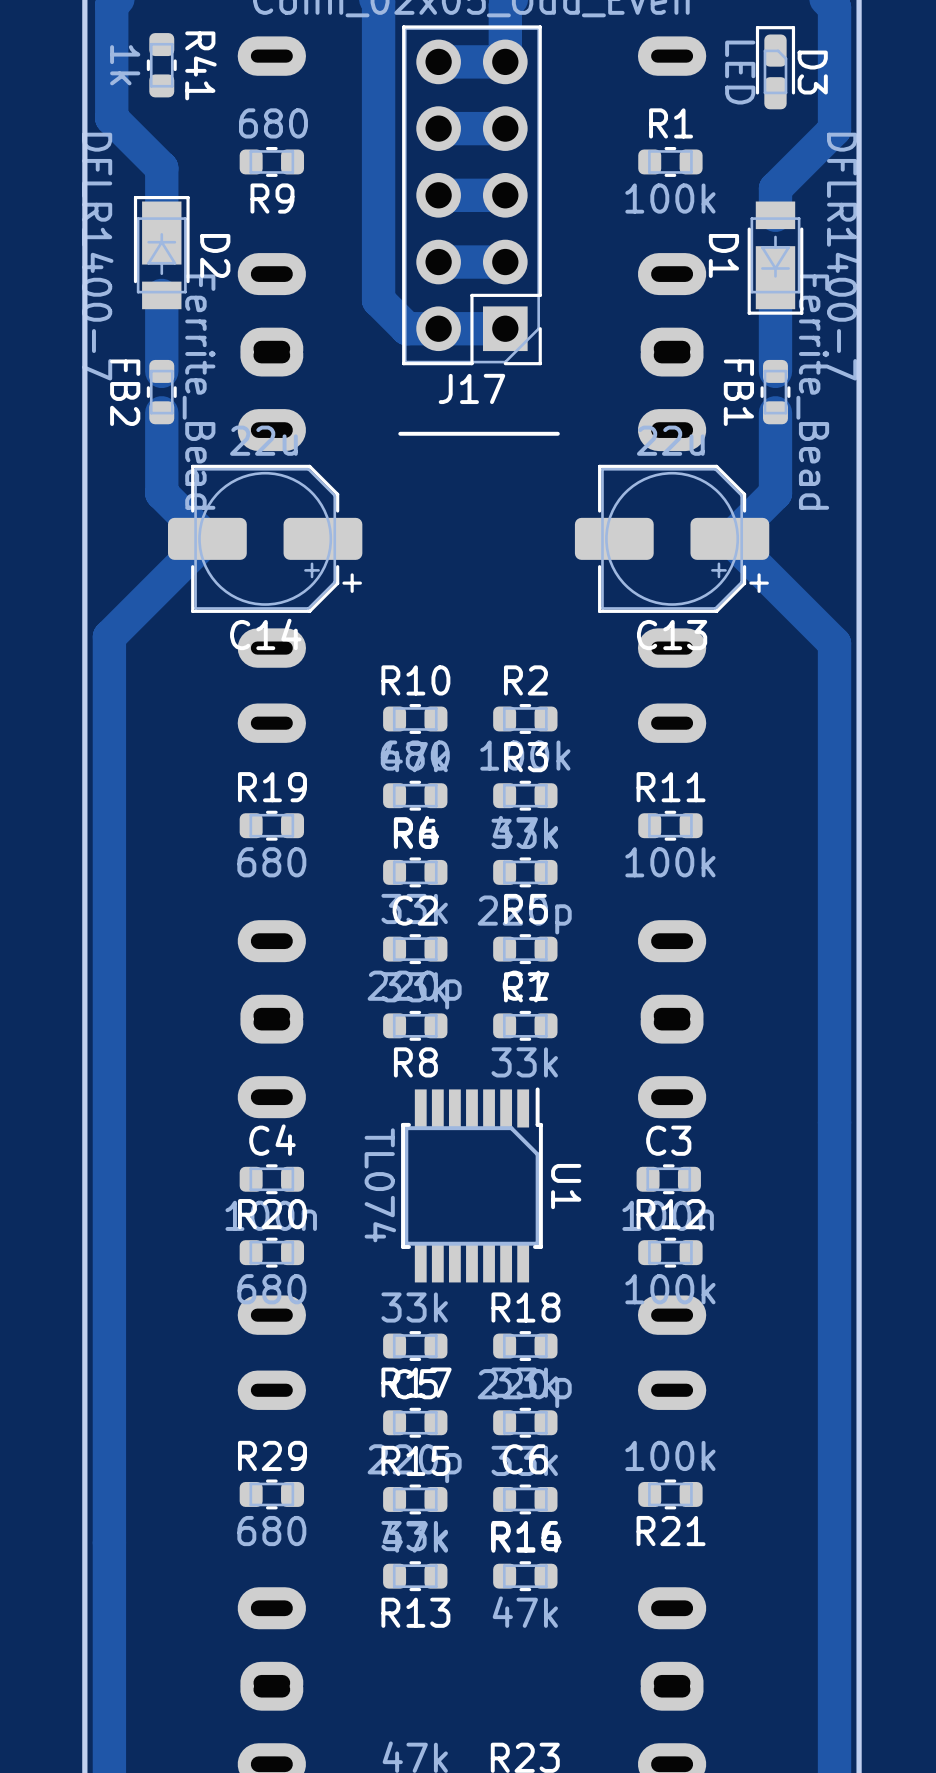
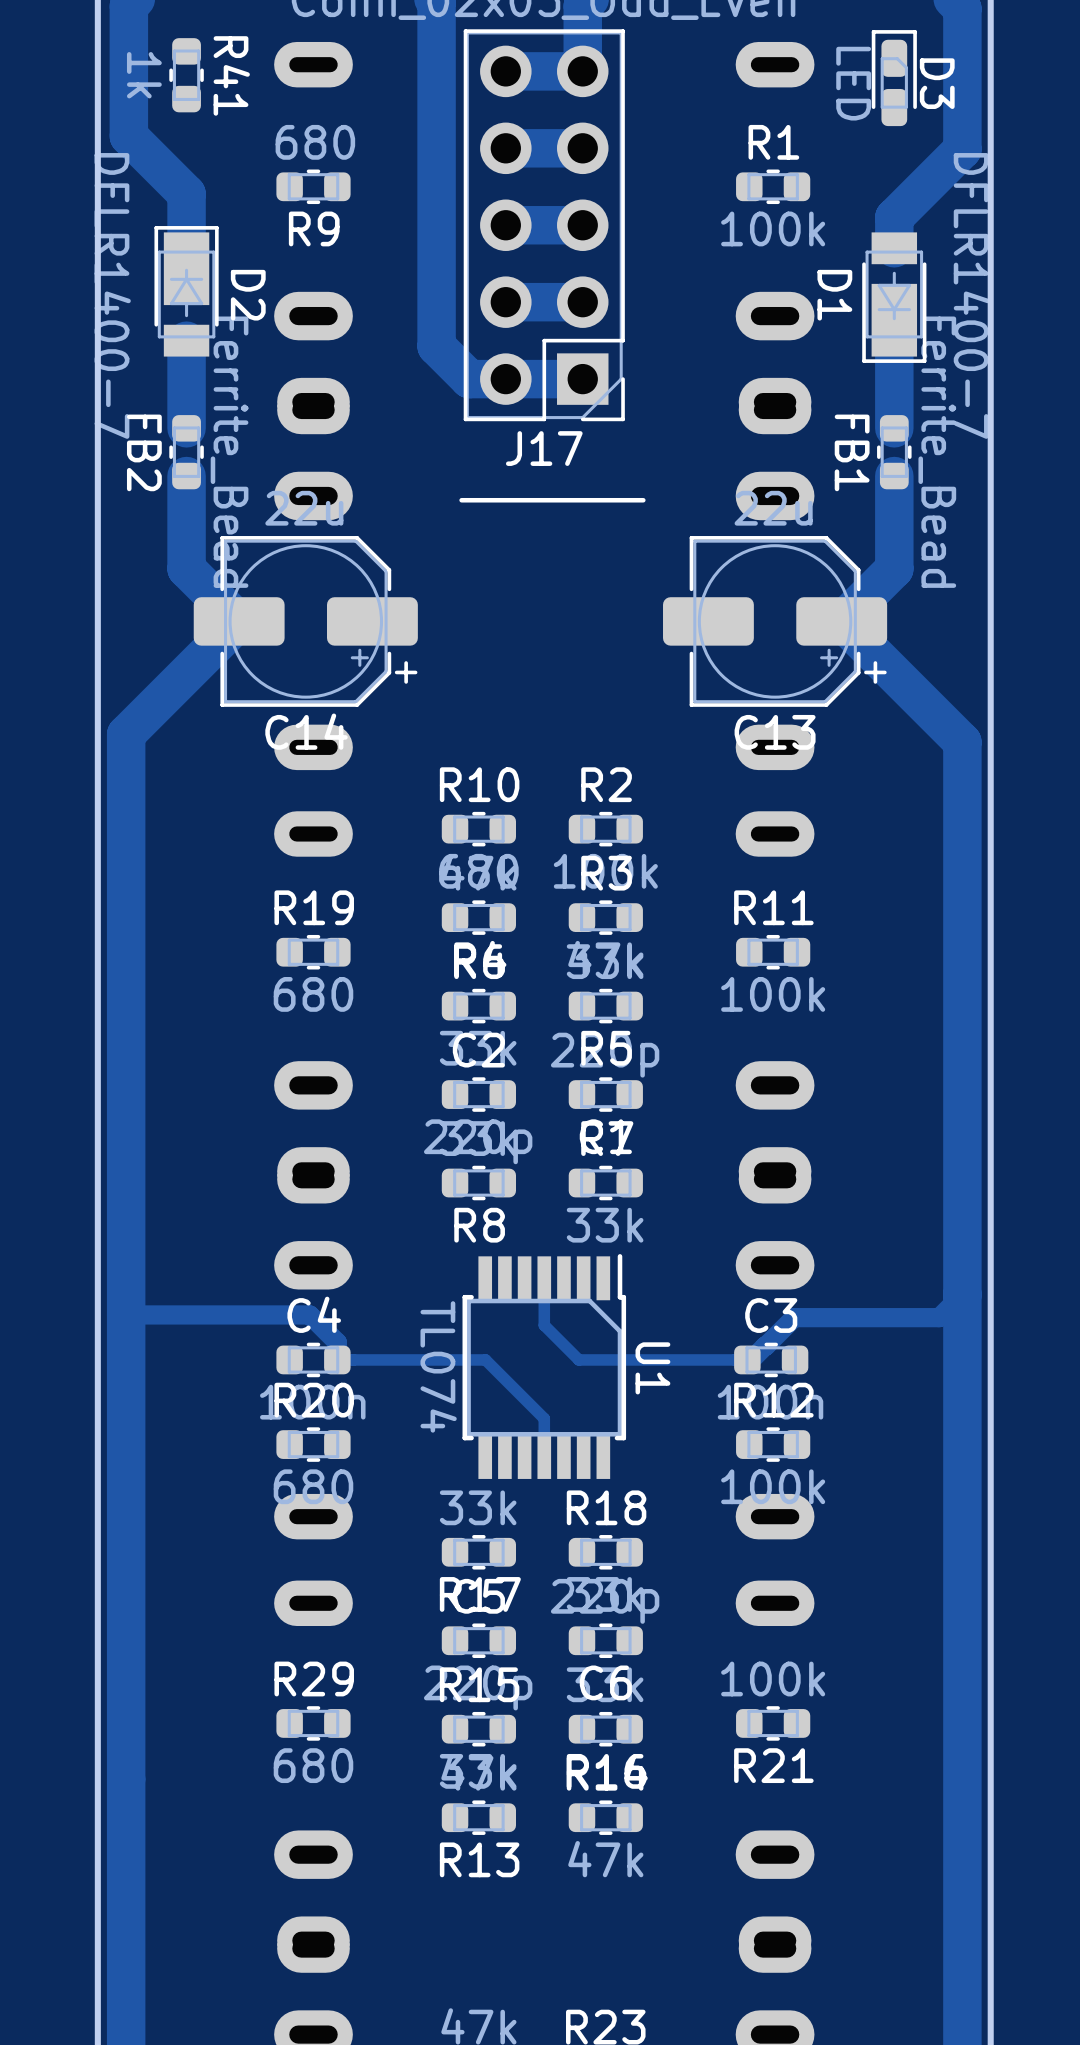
track: none -> (544, 1278) (544, 1325) (578, 1359) (751, 1359) (794, 1317) (939, 1317) (962, 1294)
track: none -> (126, 1314) (309, 1314) (337, 1342) (337, 1359) (485, 1359) (544, 1418) (544, 1456)

